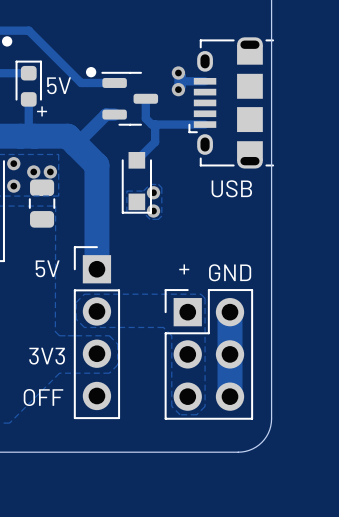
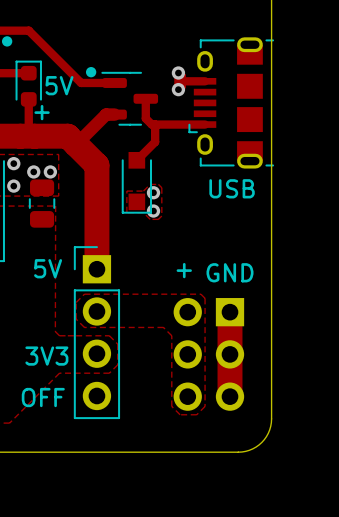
part side: top (208, 354) -> bottom (208, 354)

